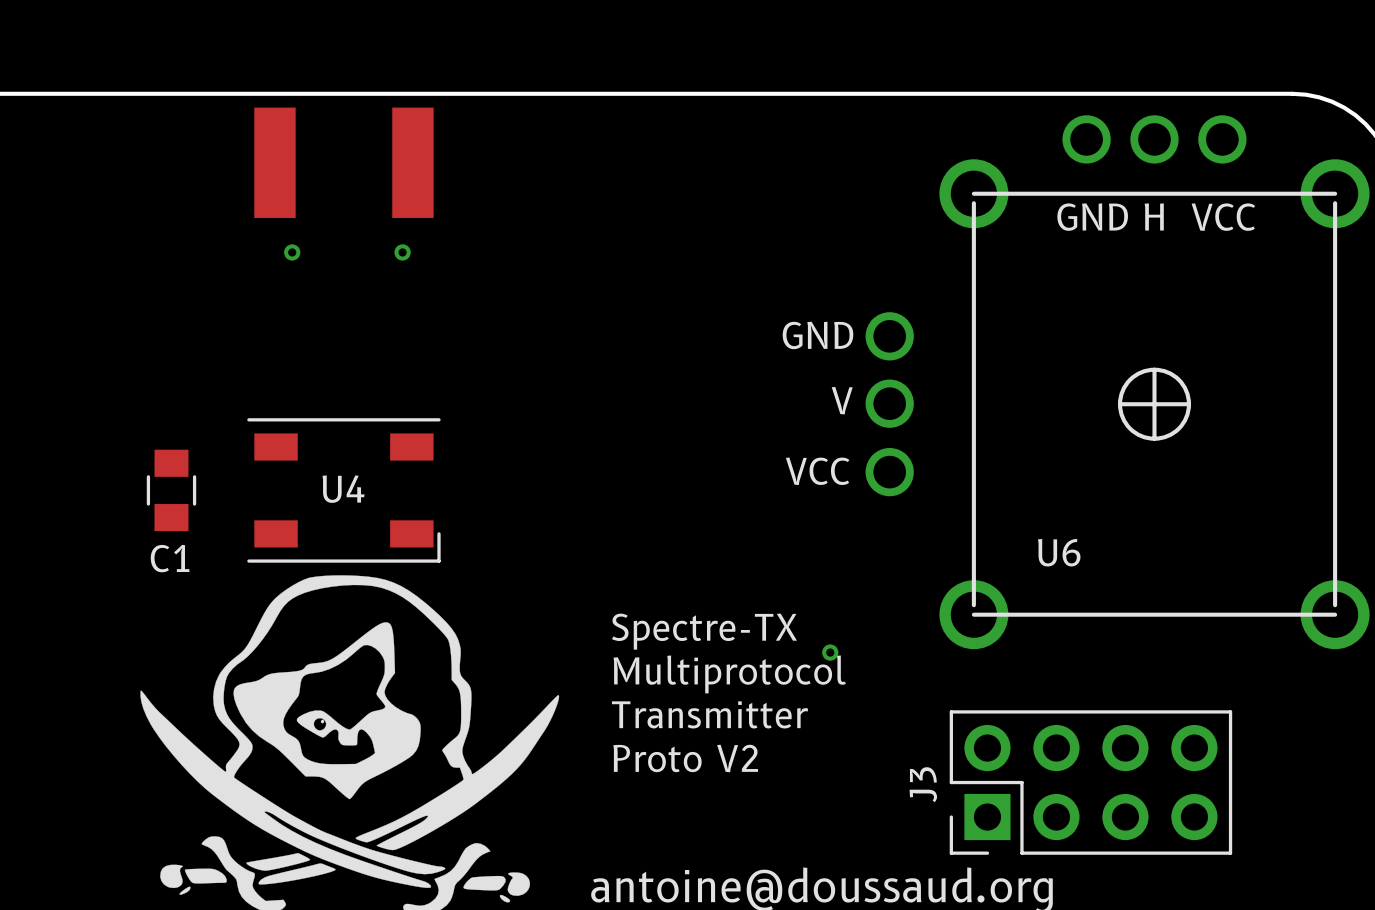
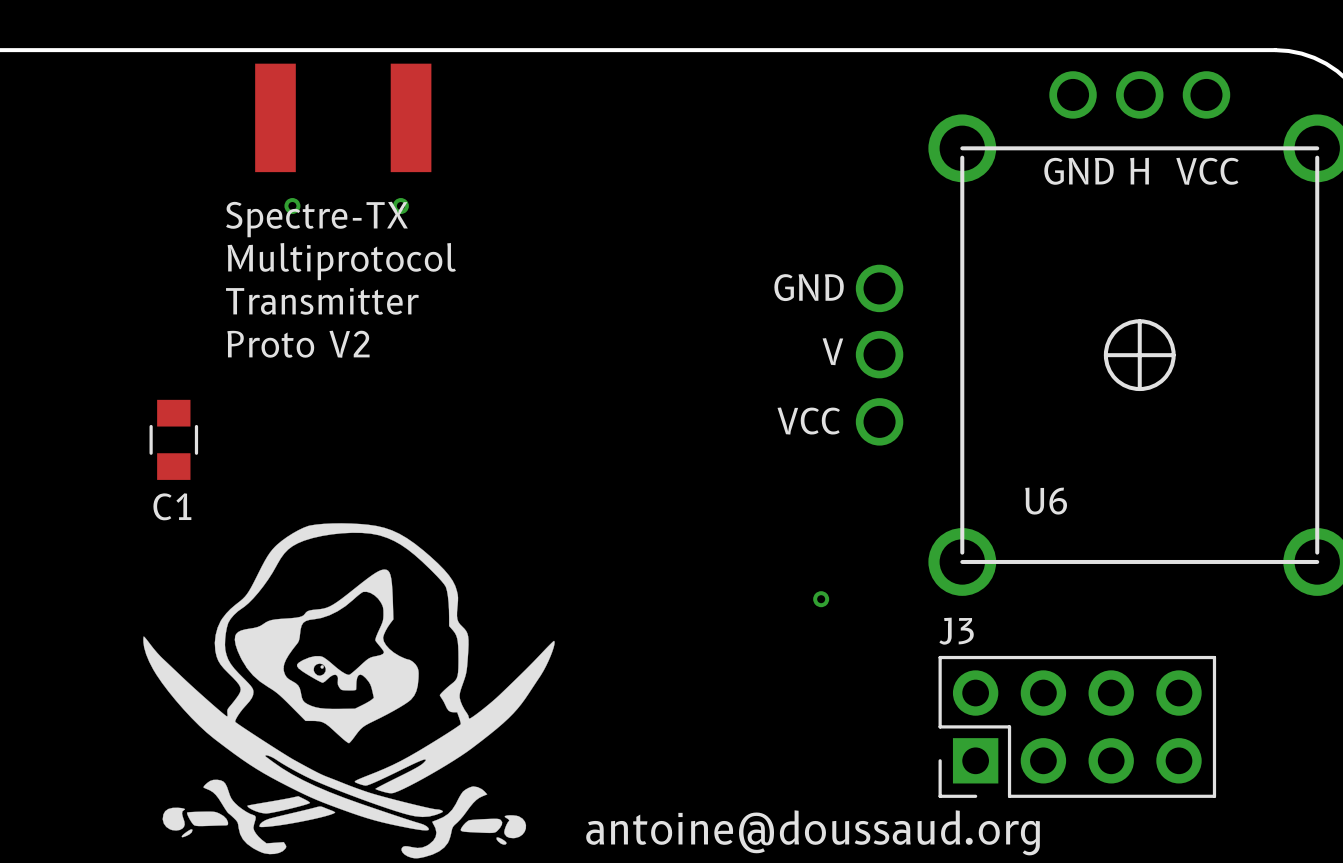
U4: (343, 490) -> none
text position: Spectre-TX (704, 631) -> Spectre-TX (316, 219)
text position: Multiprotocol (729, 674) -> Multiprotocol (341, 261)
text position: Transmitter (709, 714) -> Transmitter (322, 301)
text position: Proto V2 (685, 758) -> Proto V2 (298, 344)
J3 name rotation: 0° (923, 784) -> 90° clockwise (956, 631)
J3 name position: J3 (923, 784) -> J3 (956, 631)

